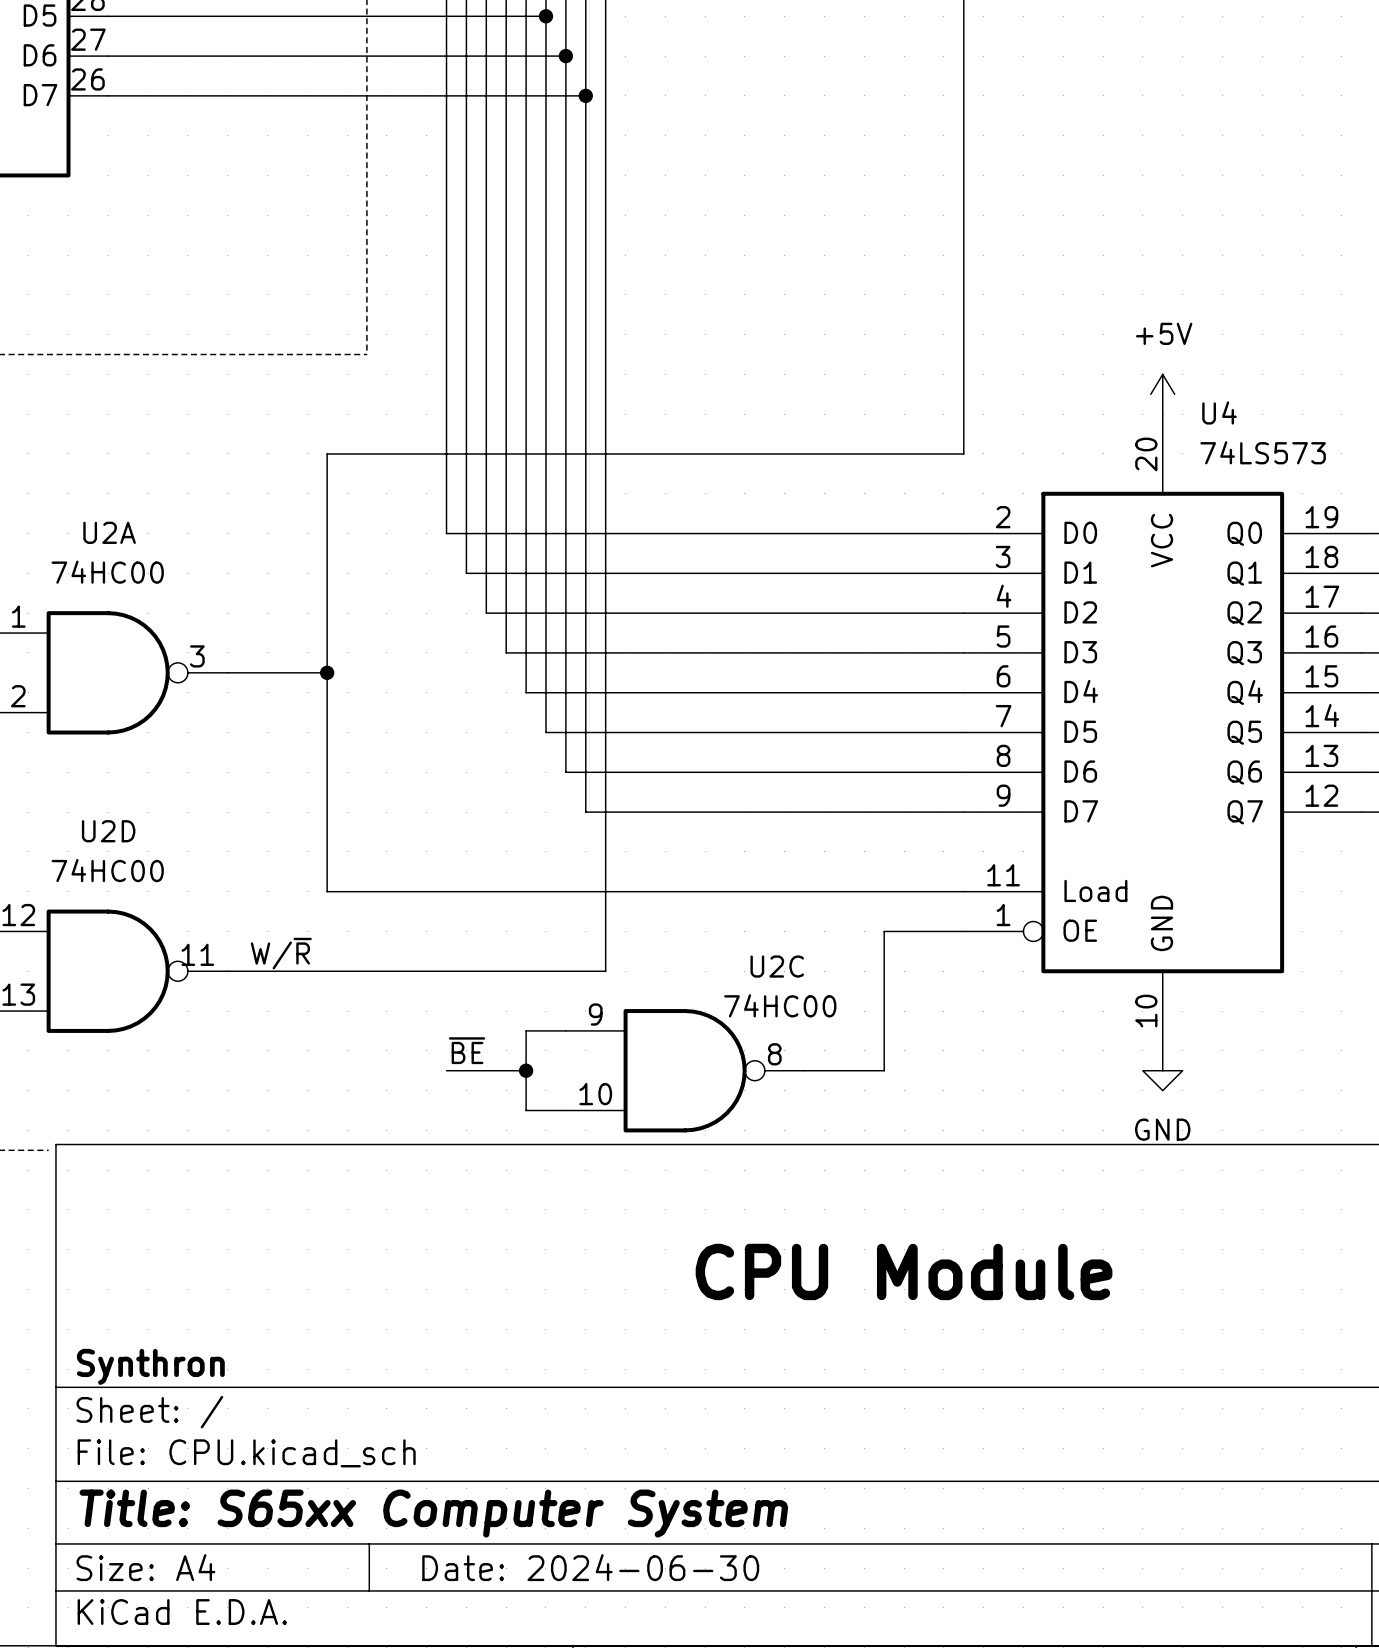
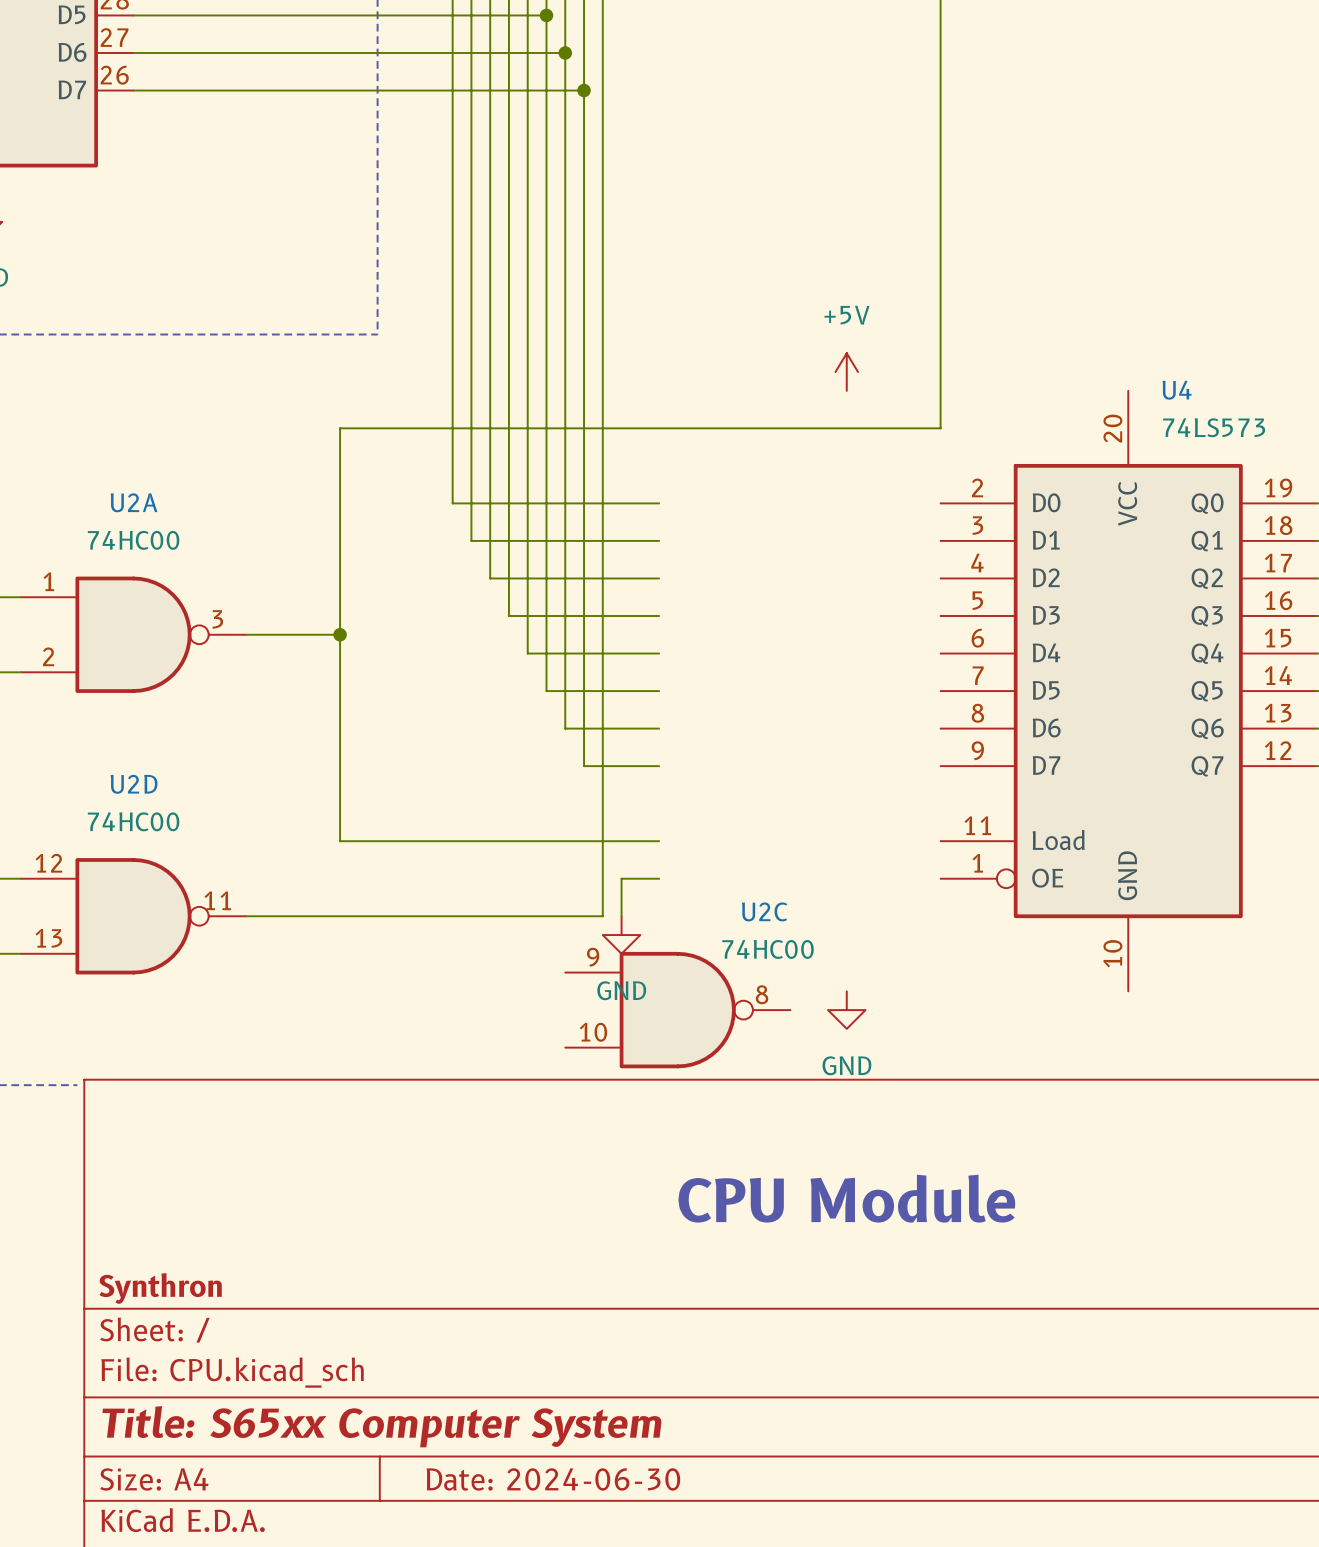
power symbol position: +5V (1162, 394) -> +5V (846, 372)
wire: (665, 533) (963, 533) -> none
wire: (665, 573) (963, 573) -> none
wire: (665, 613) (963, 613) -> none
wire: (665, 652) (963, 652) -> none
wire: (665, 692) (963, 692) -> none
wire: (665, 732) (963, 732) -> none
wire: (665, 772) (963, 772) -> none
wire: (665, 812) (963, 812) -> none
wire: (665, 891) (963, 891) -> none
wire: none -> (659, 878) (621, 878) (621, 916)
wire: (963, 931) (884, 931) (884, 1070) (804, 1070) -> none
label: W/~{R} (281, 953) -> none
power symbol: none -> GND (621, 935)
wire: (565, 1030) (526, 1030) (526, 1110) (565, 1110) -> none
label: ~{BE} (467, 1050) -> none
wire: (446, 1070) (526, 1070) -> none
junction: (526, 1070) -> none
power symbol: none -> GND (846, 1010)
power symbol: GND (1162, 1070) -> none

